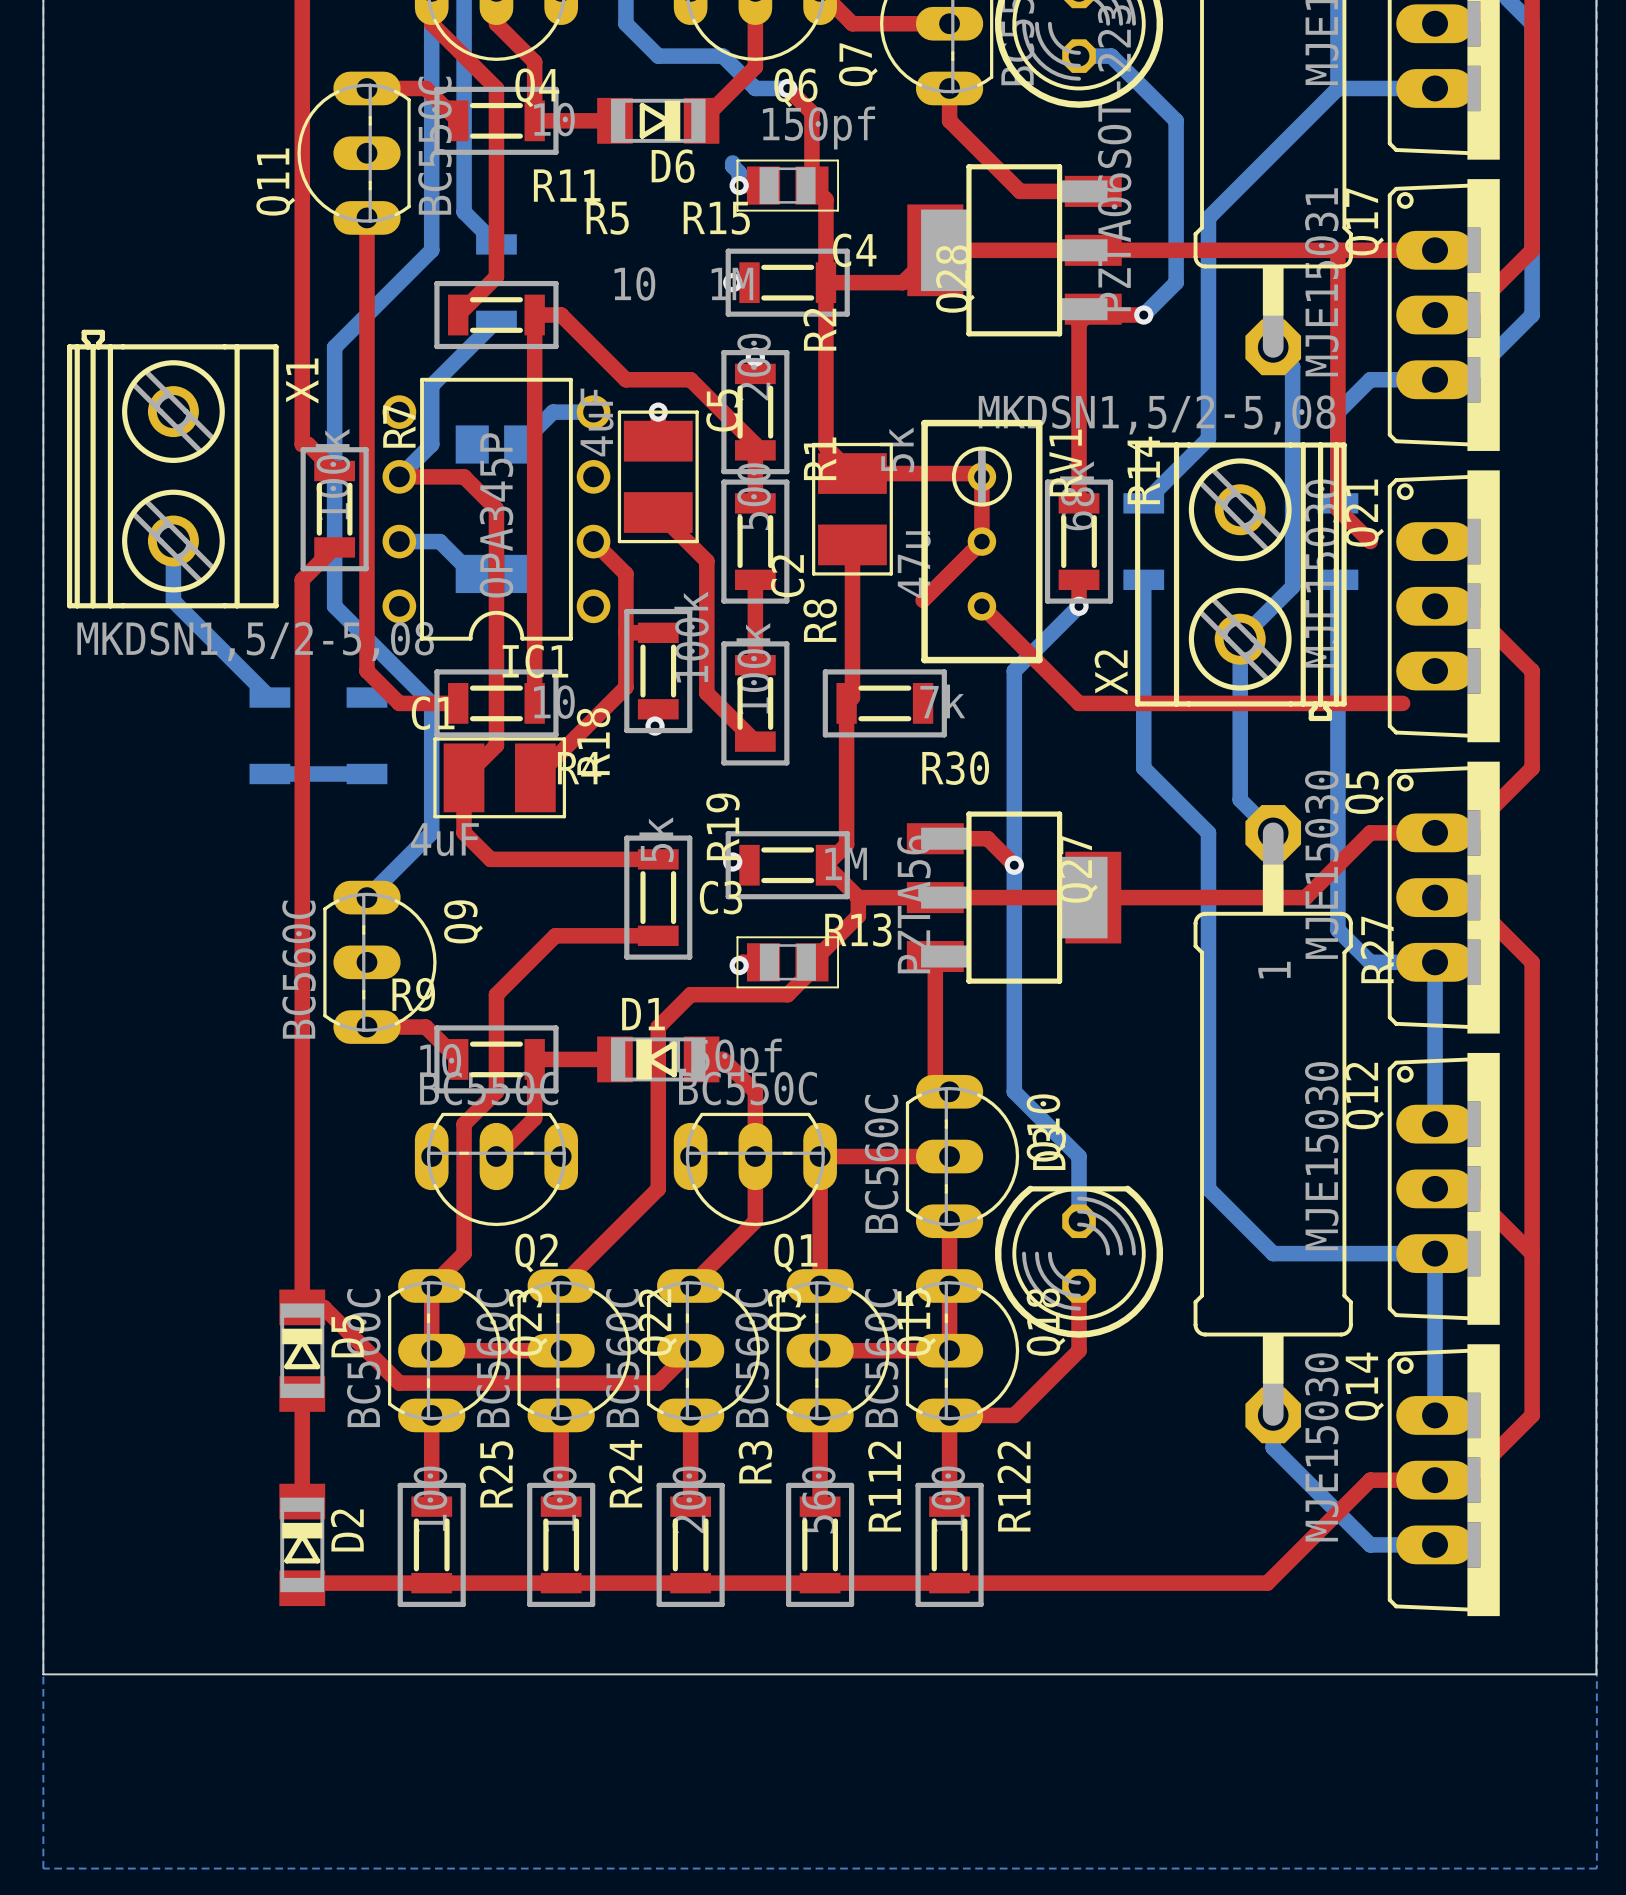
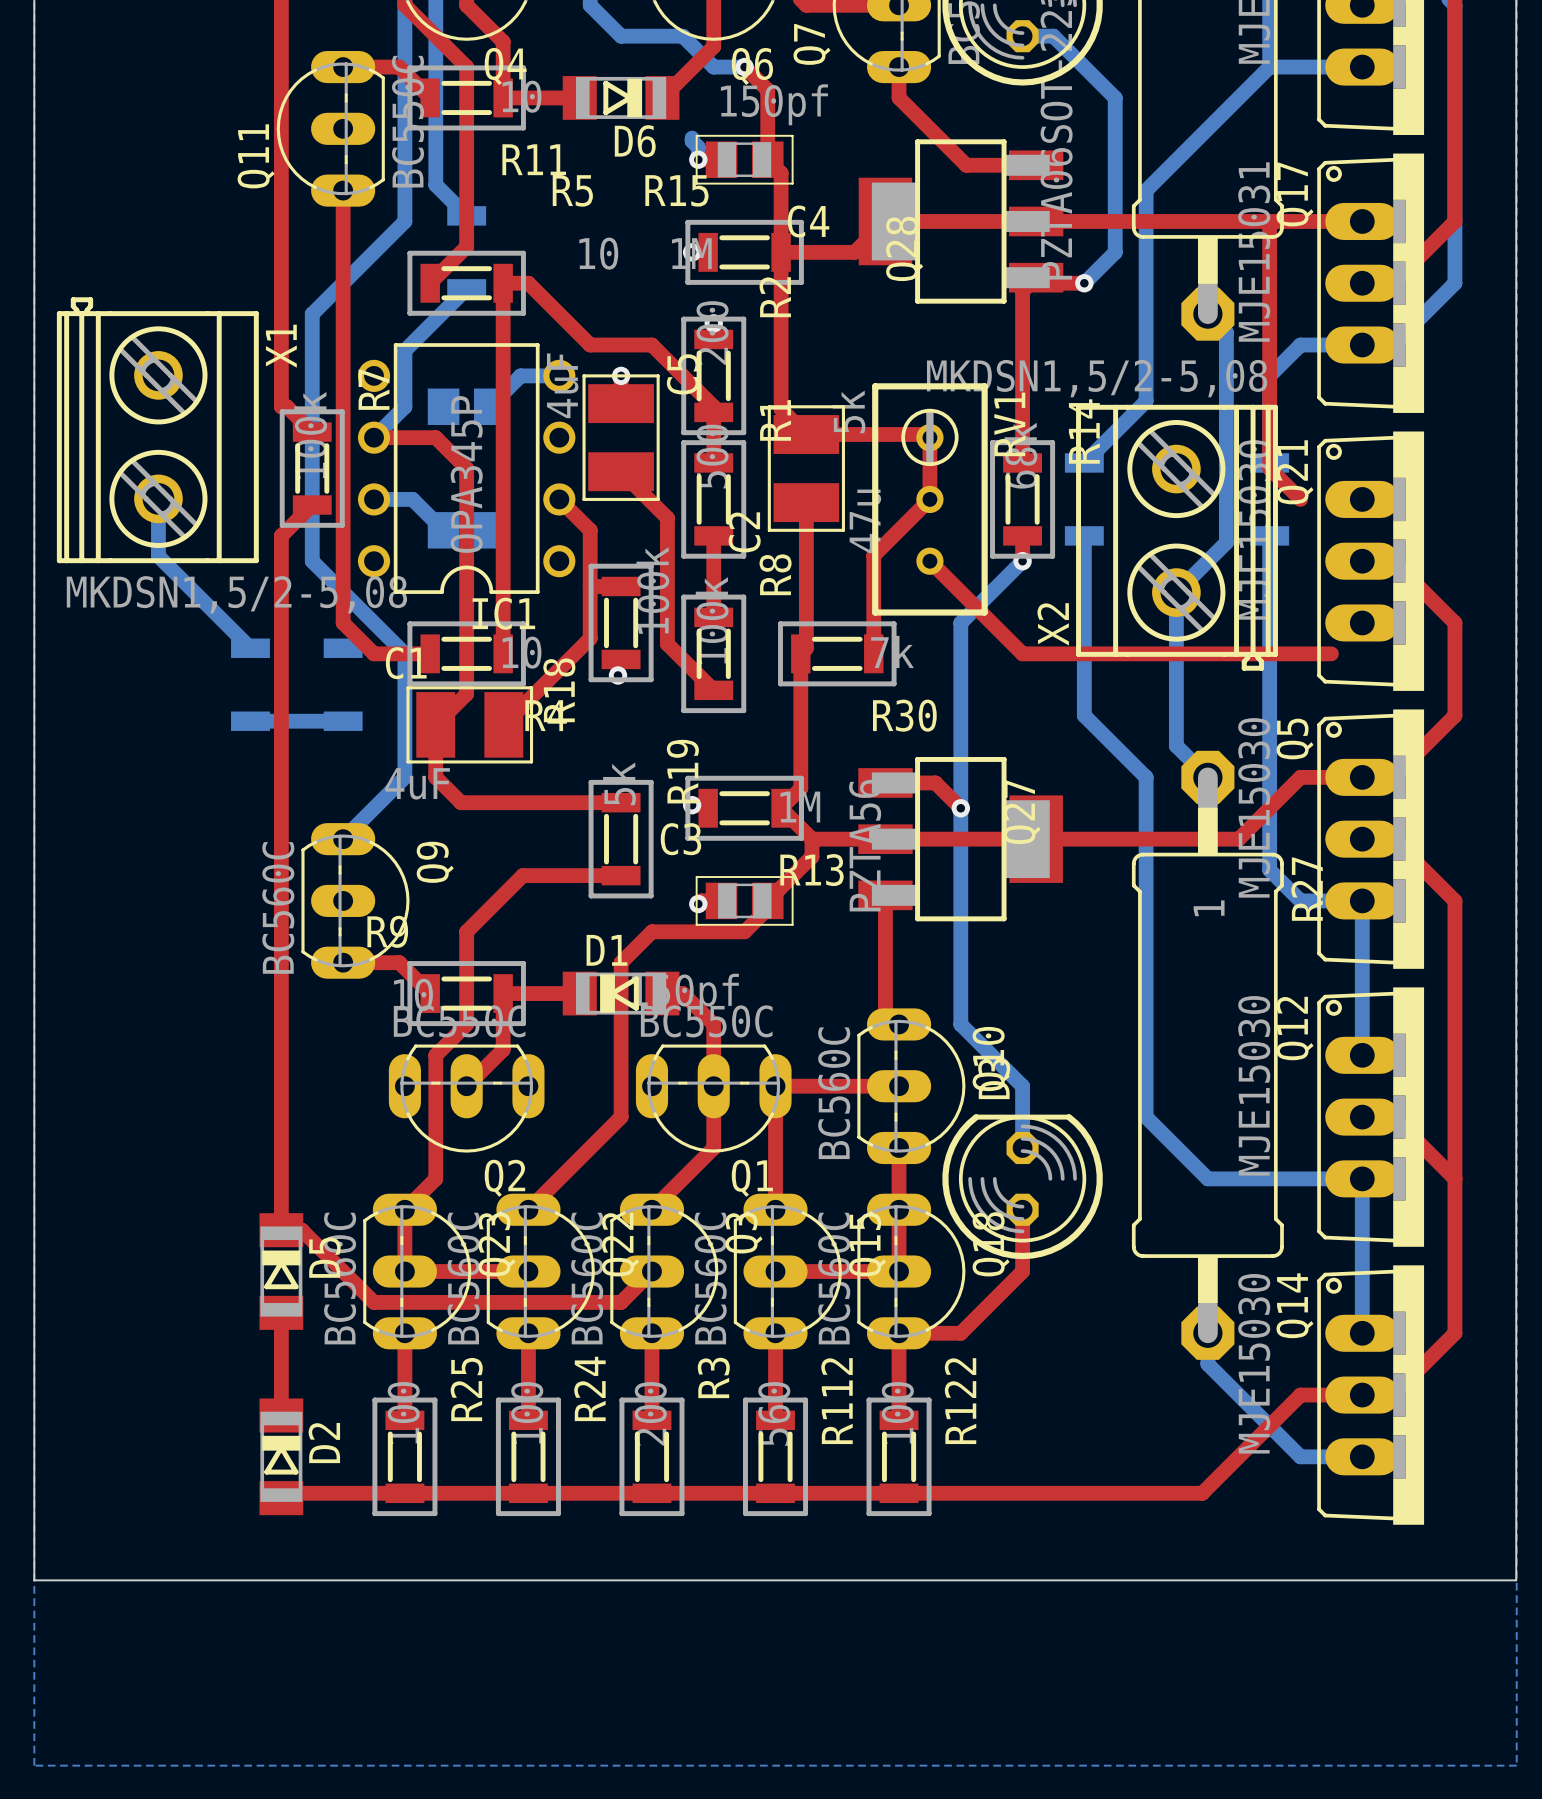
top track: none -> (873, 555) (873, 653)

